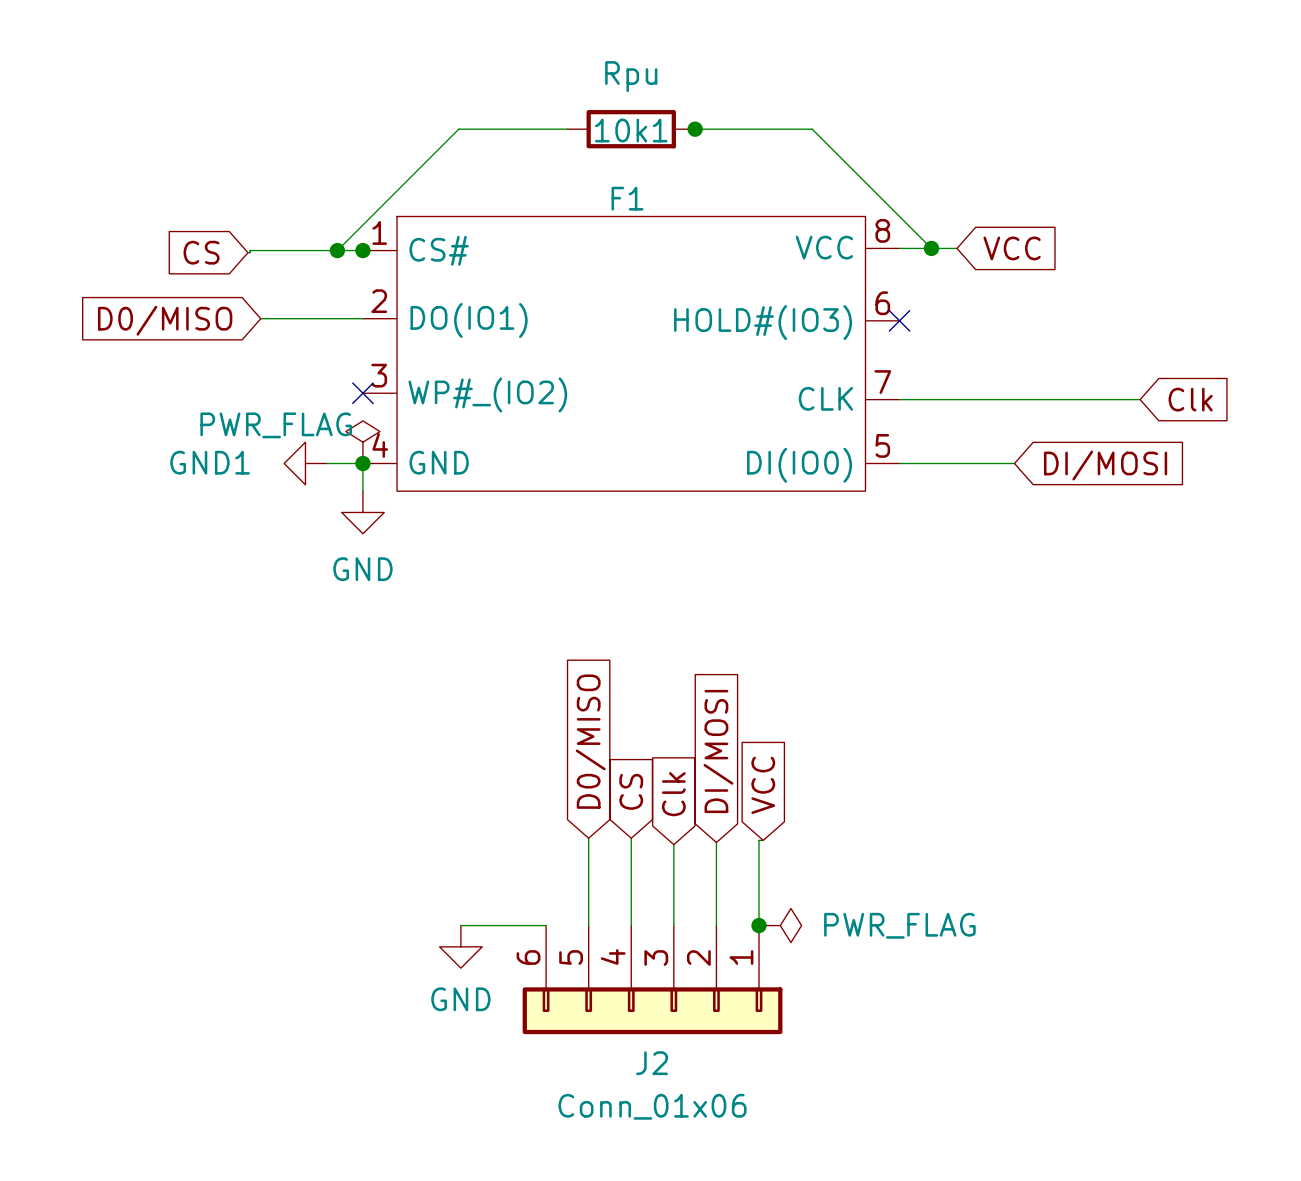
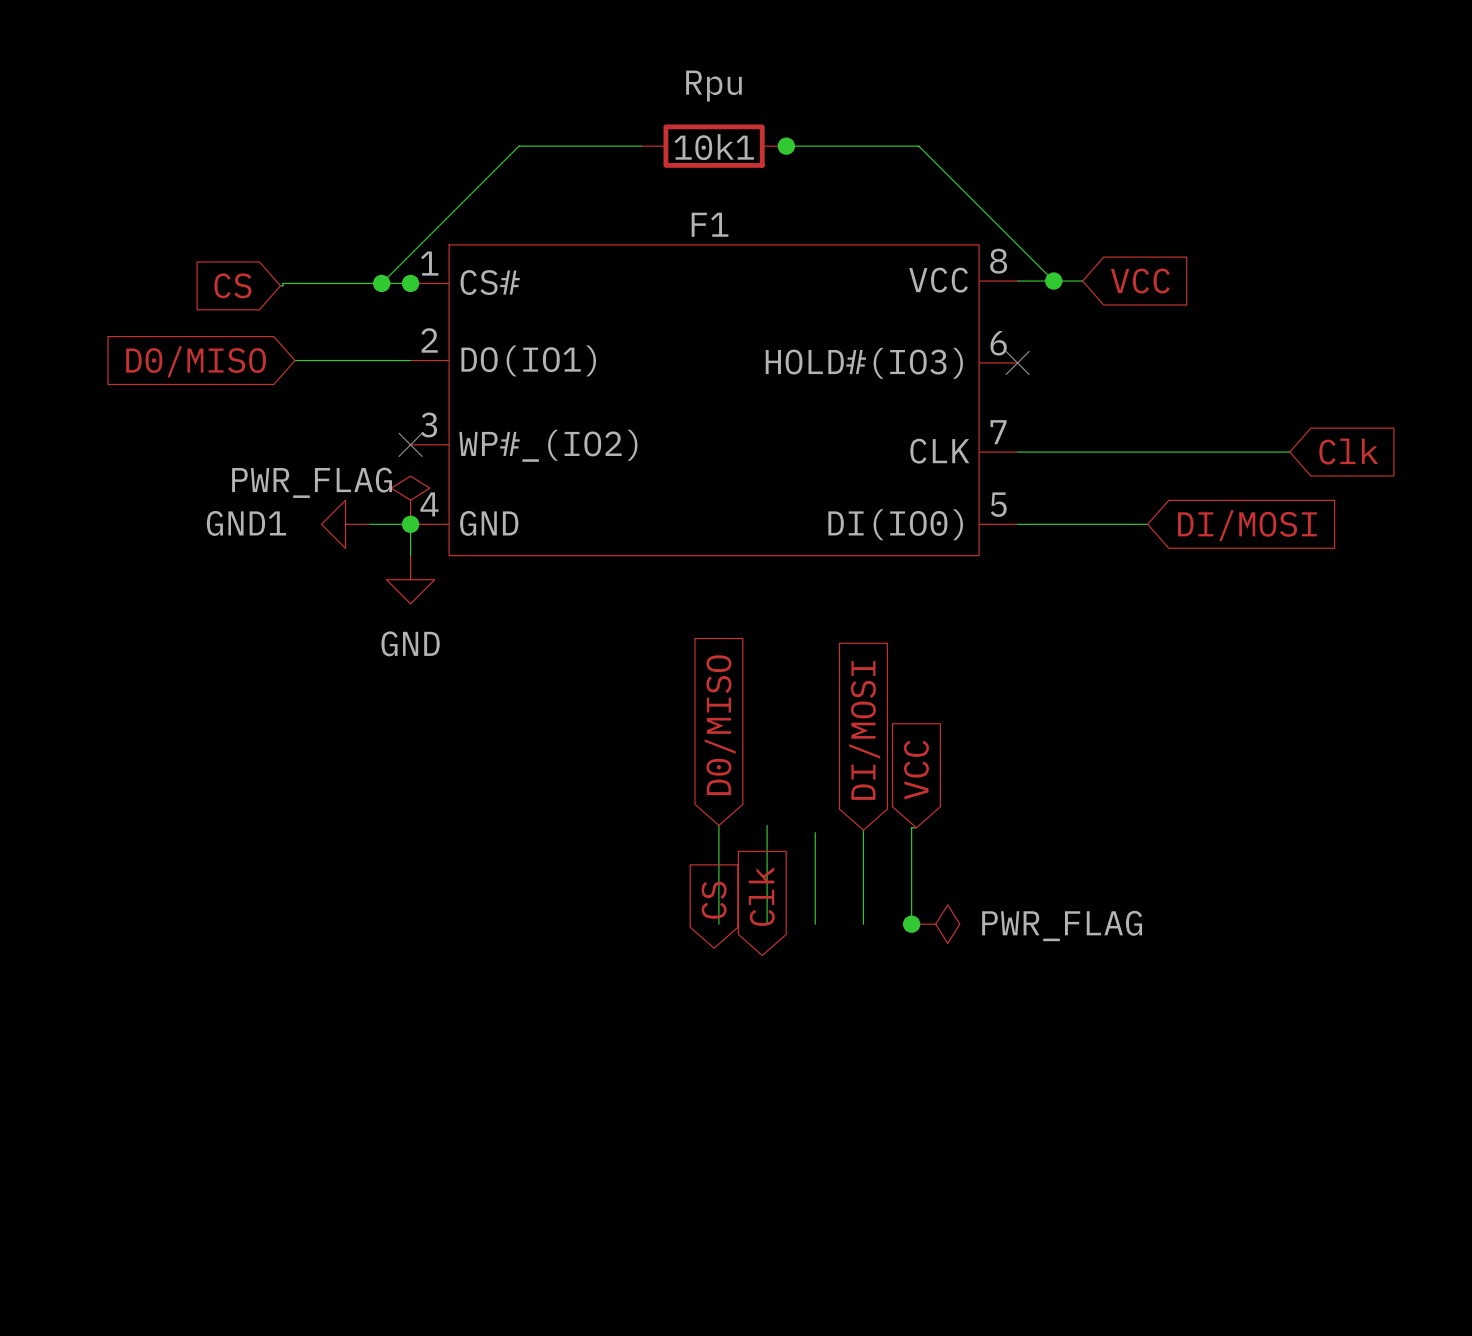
global label position: D0/MISO (590, 741) -> D0/MISO (720, 725)
global label position: DI/MOSI (718, 751) -> DI/MOSI (864, 730)
global label position: VCC (763, 785) -> VCC (916, 770)
junction: none -> (911, 924)
wire: (588, 838) (588, 925) -> (718, 825) (718, 924)
wire: (631, 838) (631, 925) -> (767, 825) (767, 924)
wire: (763, 840) (759, 840) (759, 925) -> (916, 827) (911, 827) (911, 924)
wire: (716, 842) (716, 925) -> (863, 830) (863, 924)
wire: (673, 844) (673, 925) -> (815, 832) (815, 924)
wire: (460, 925) (546, 925) -> none
junction: (759, 925) -> none
power symbol position: PWR_FLAG (780, 925) -> PWR_FLAG (935, 924)
power symbol: GND (460, 946) -> none
J2: Conn_01x06 (652, 979) -> none

